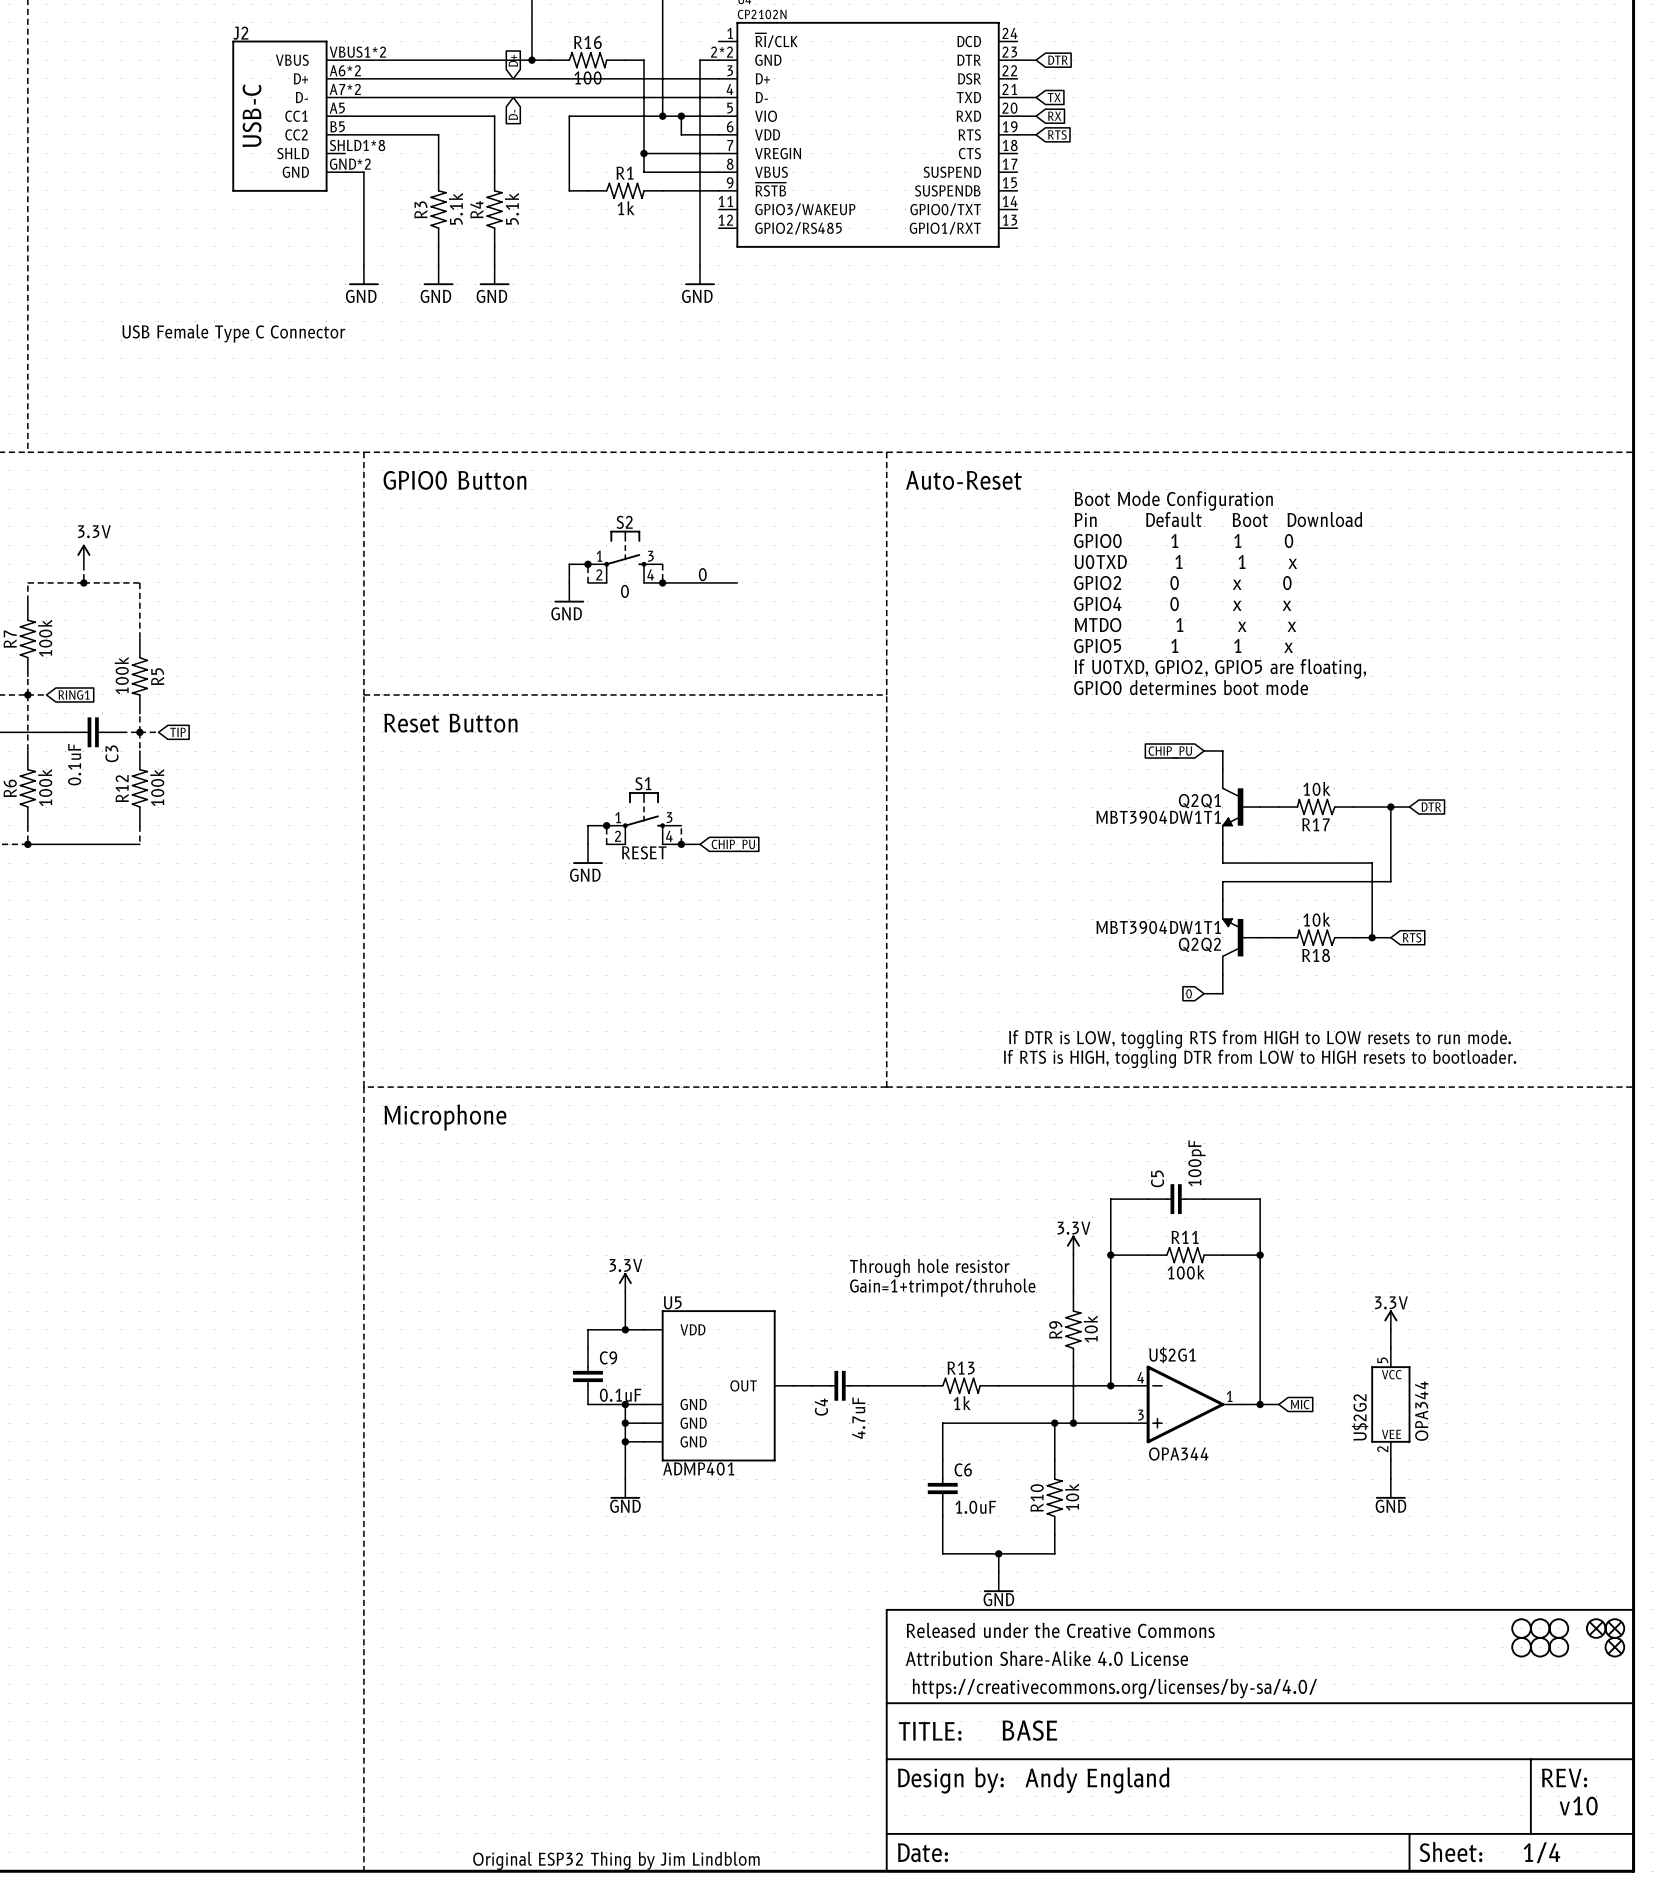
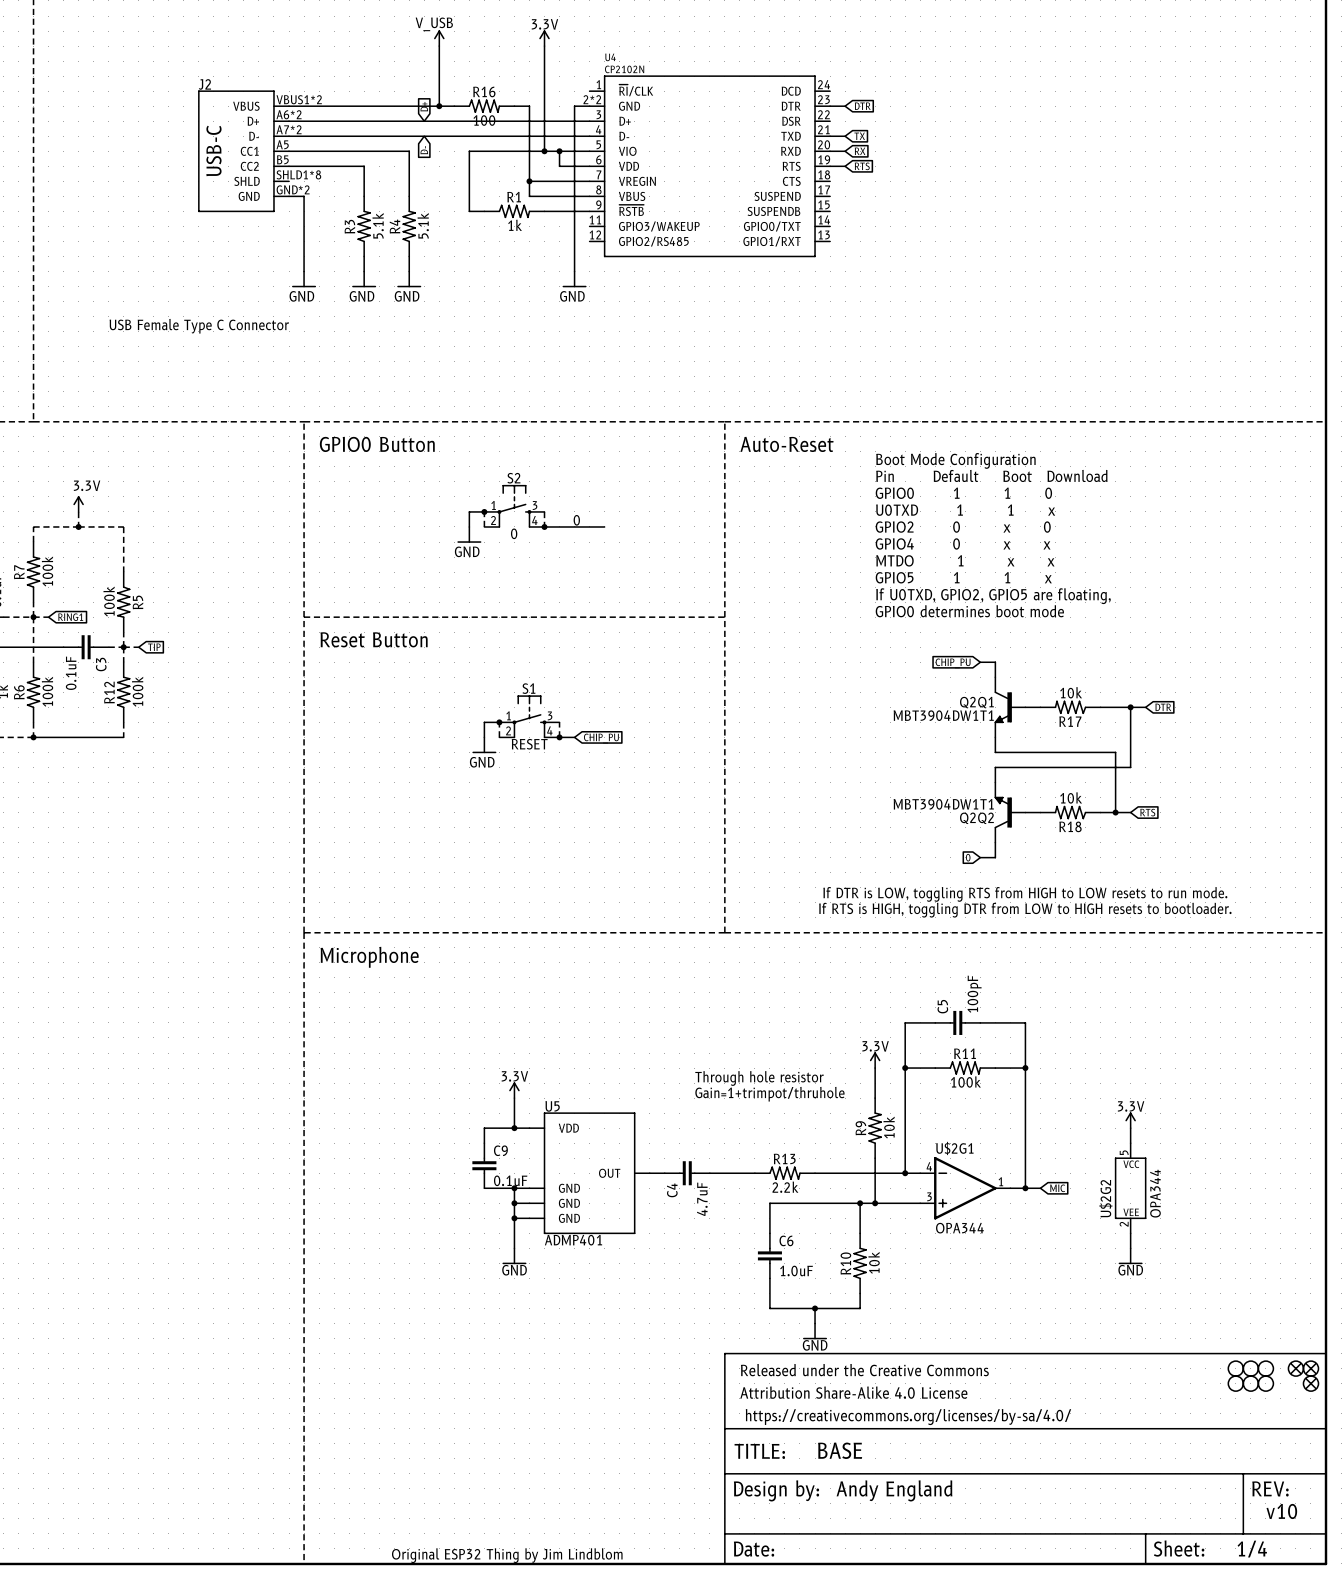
R13 value: 1k (962, 1403) -> 2.2k (785, 1187)

